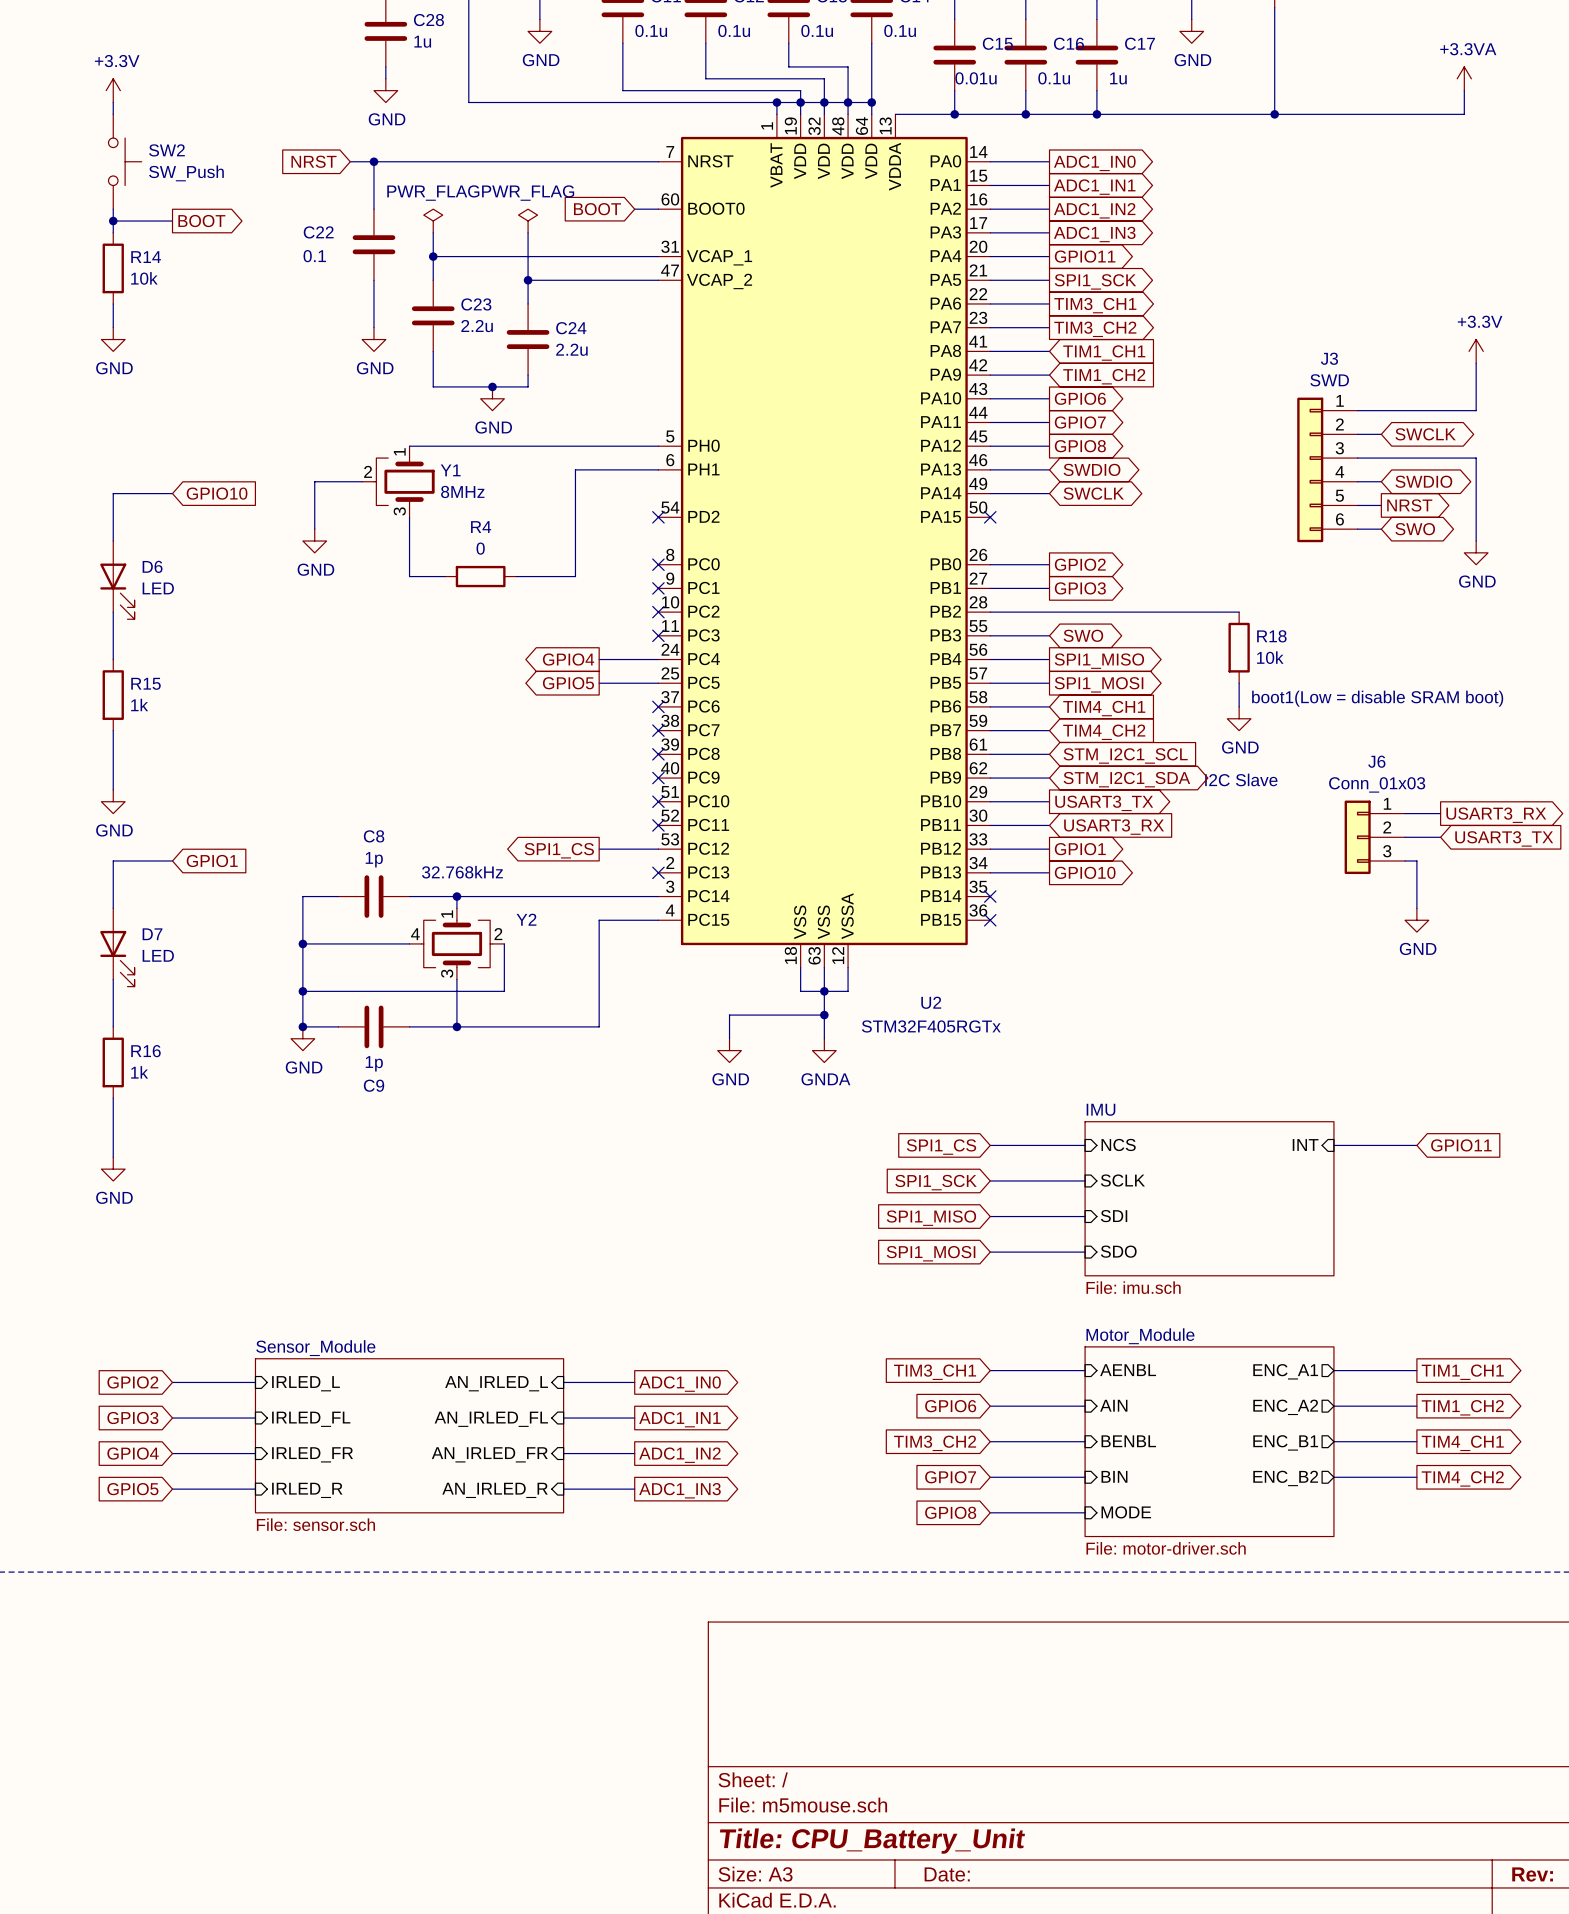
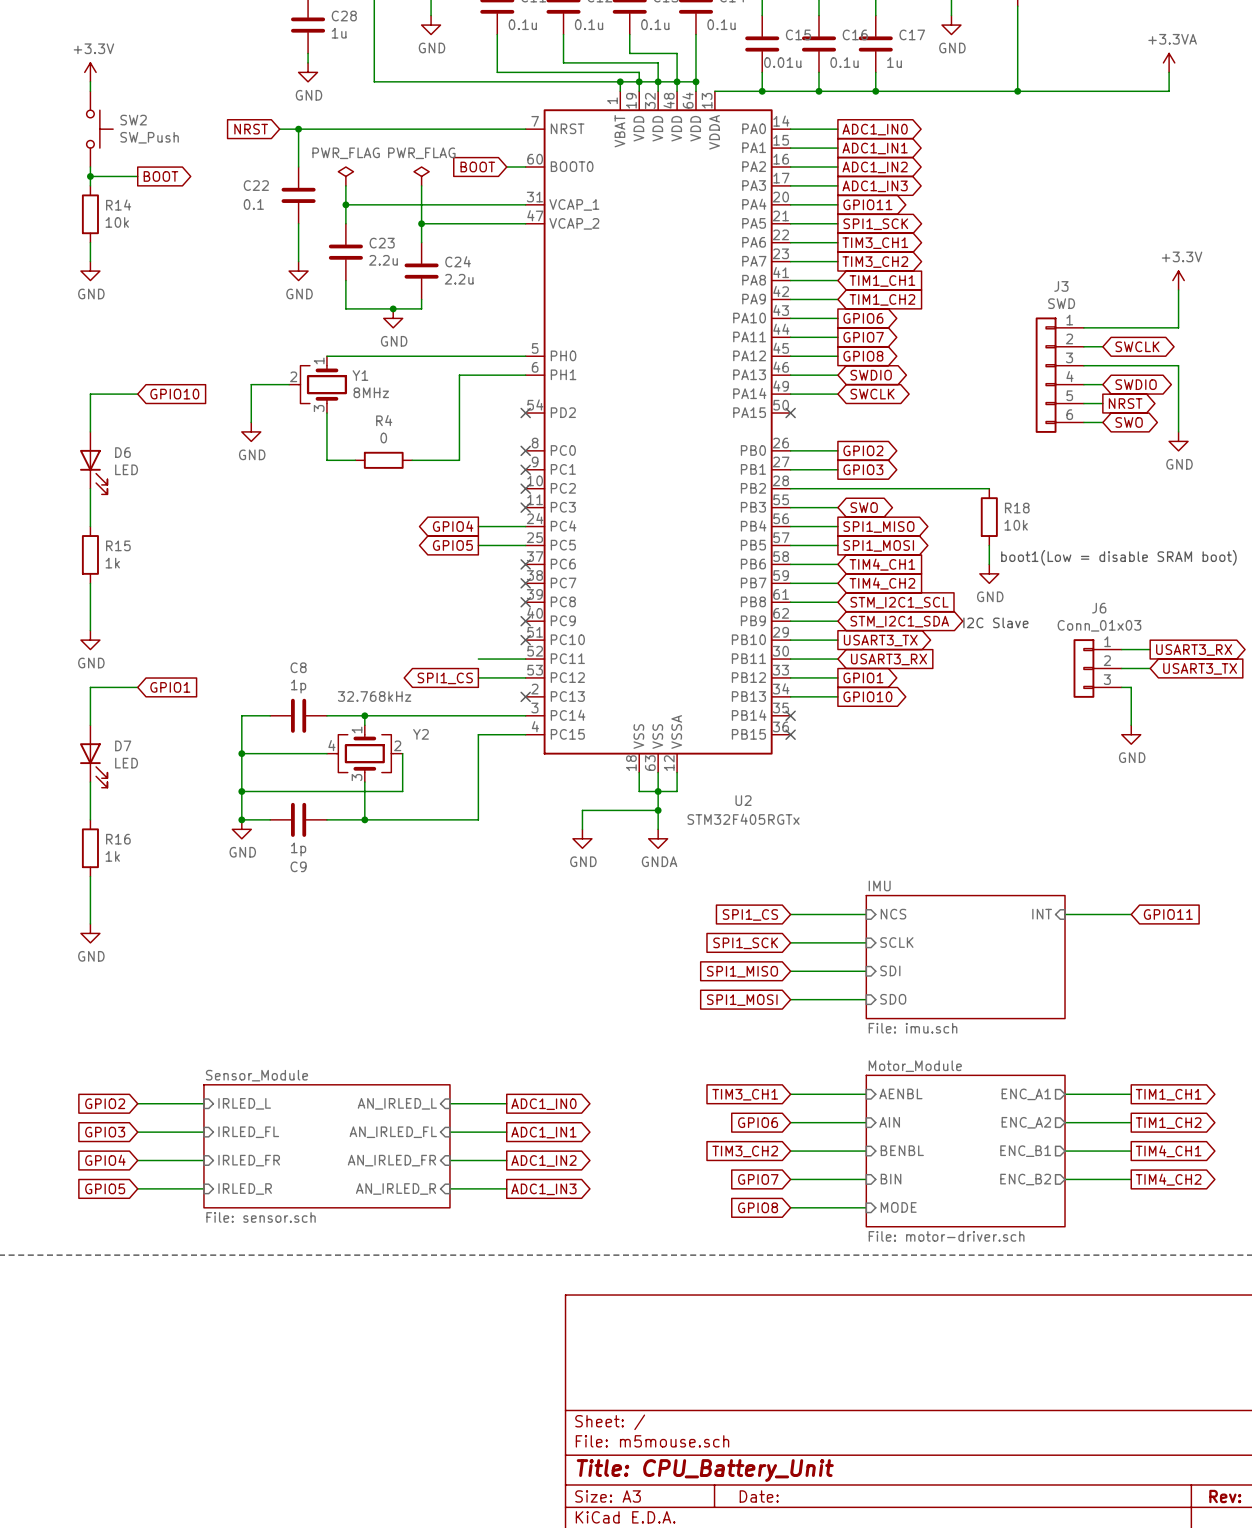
wire: none -> (478, 659) (525, 659)
no-connect mark: (658, 825) -> none

